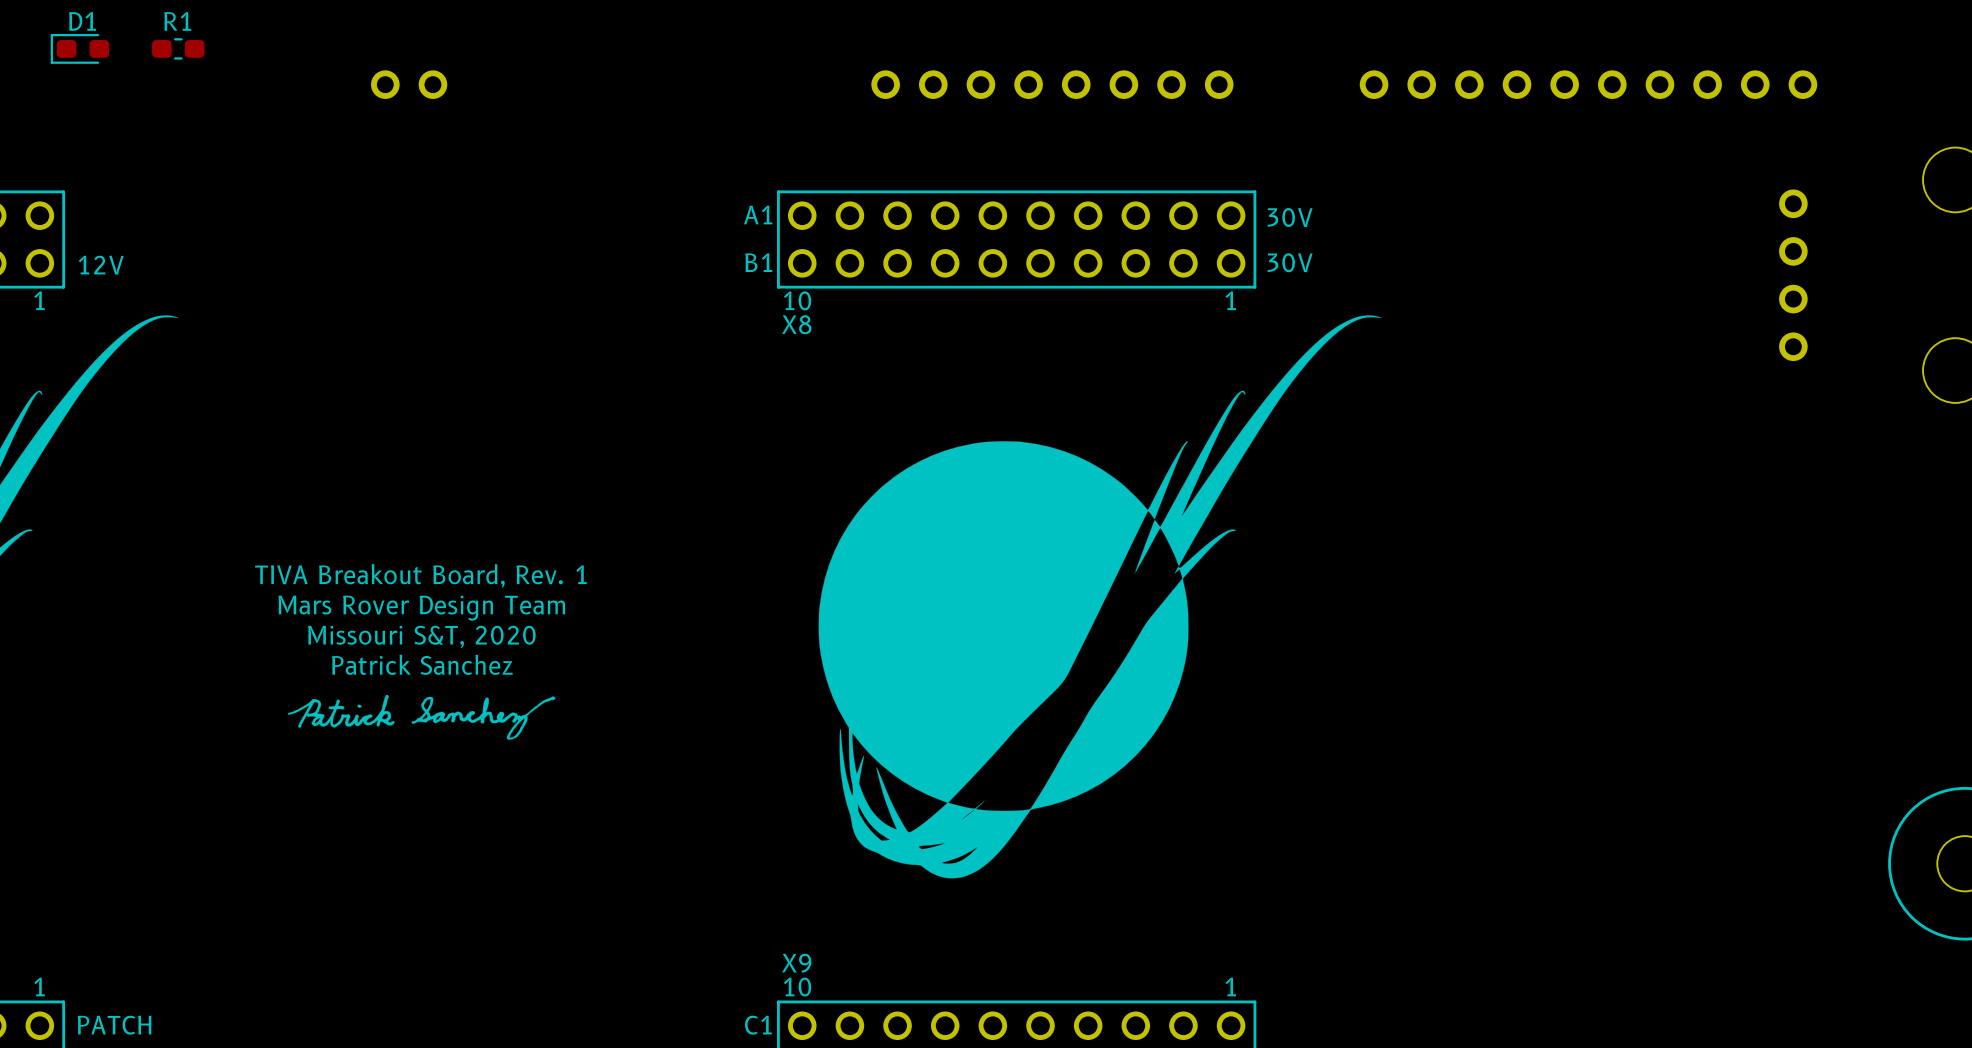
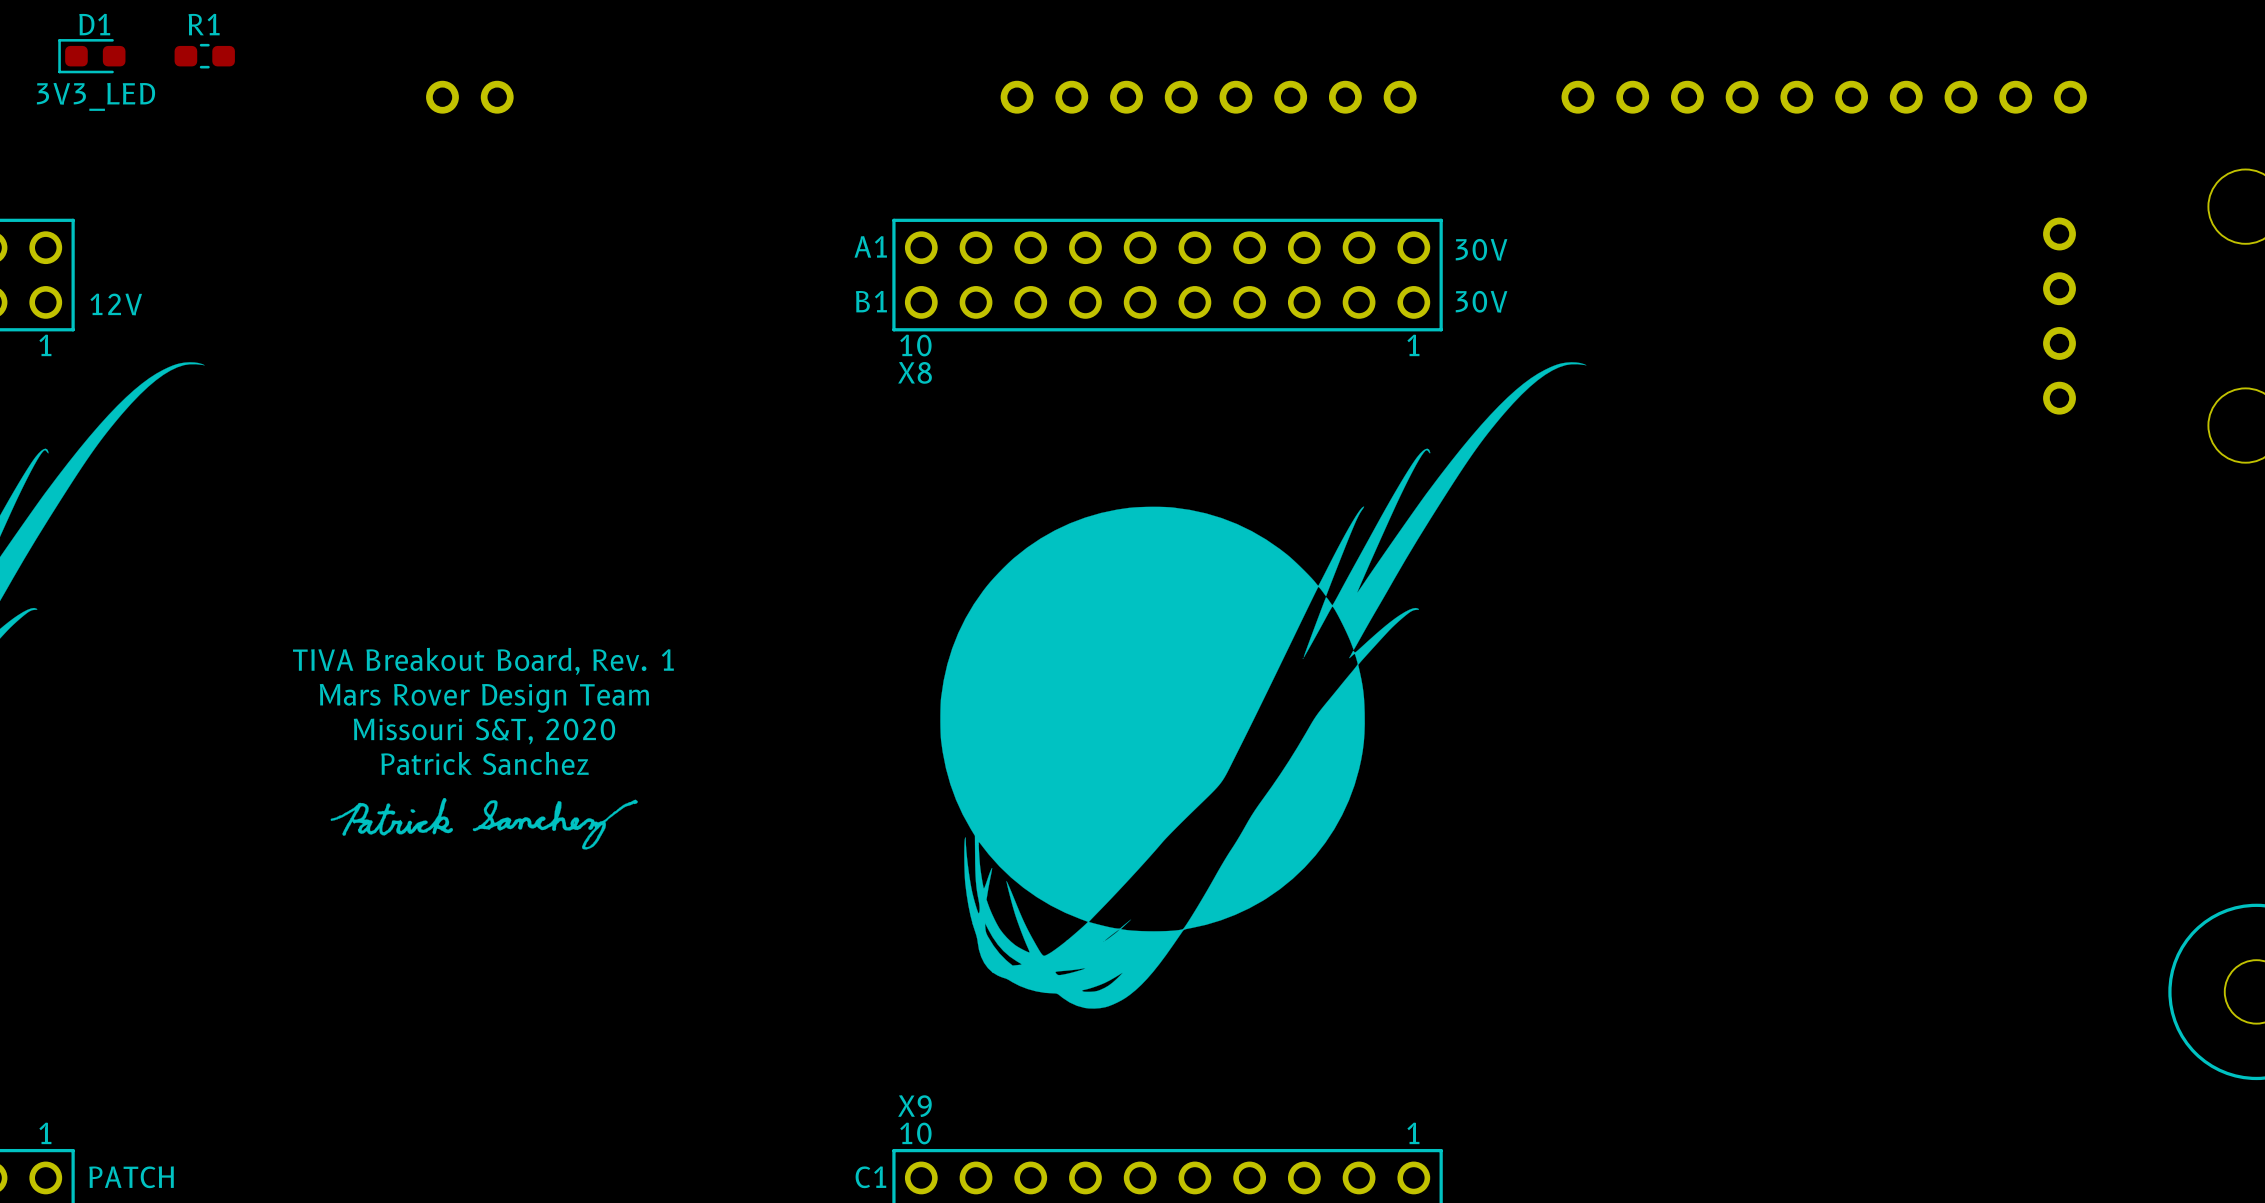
text: none -> 3V3_LED (96, 96)

